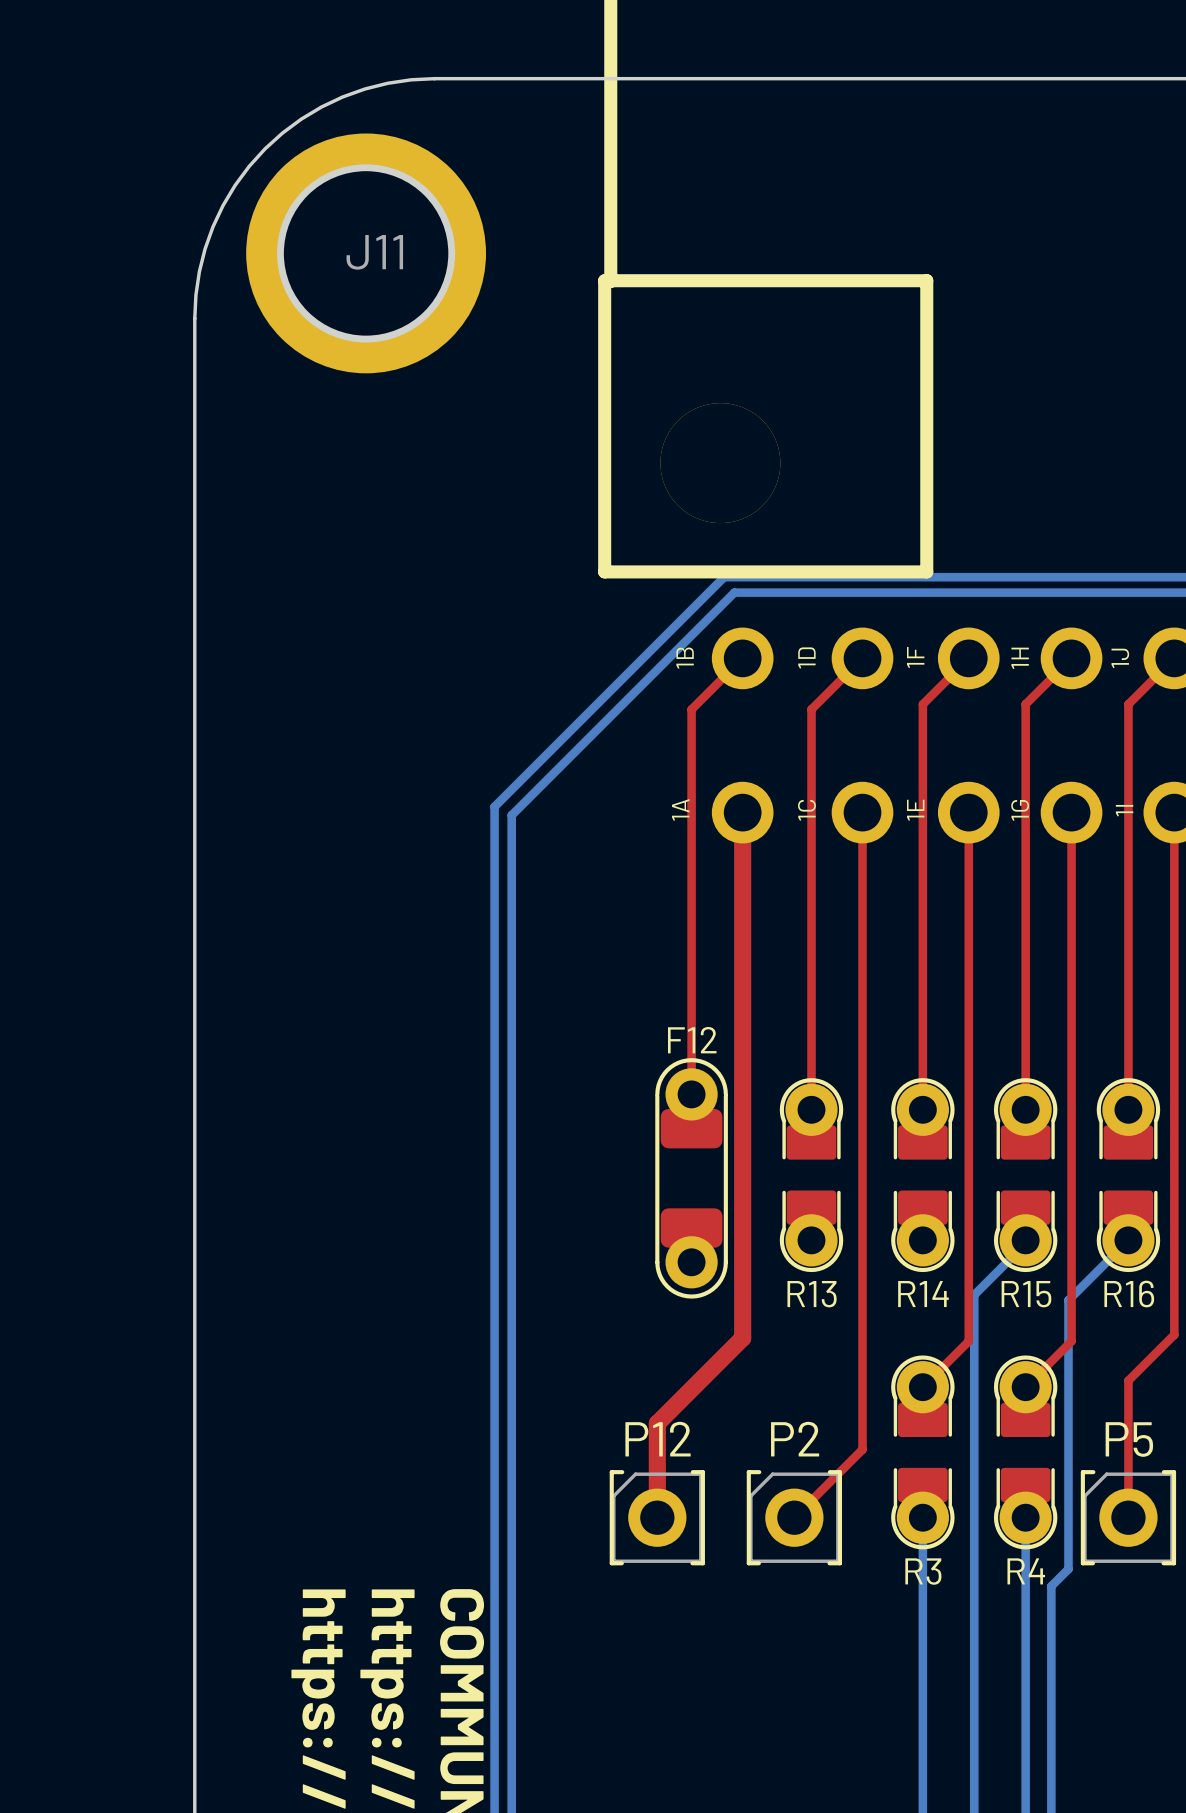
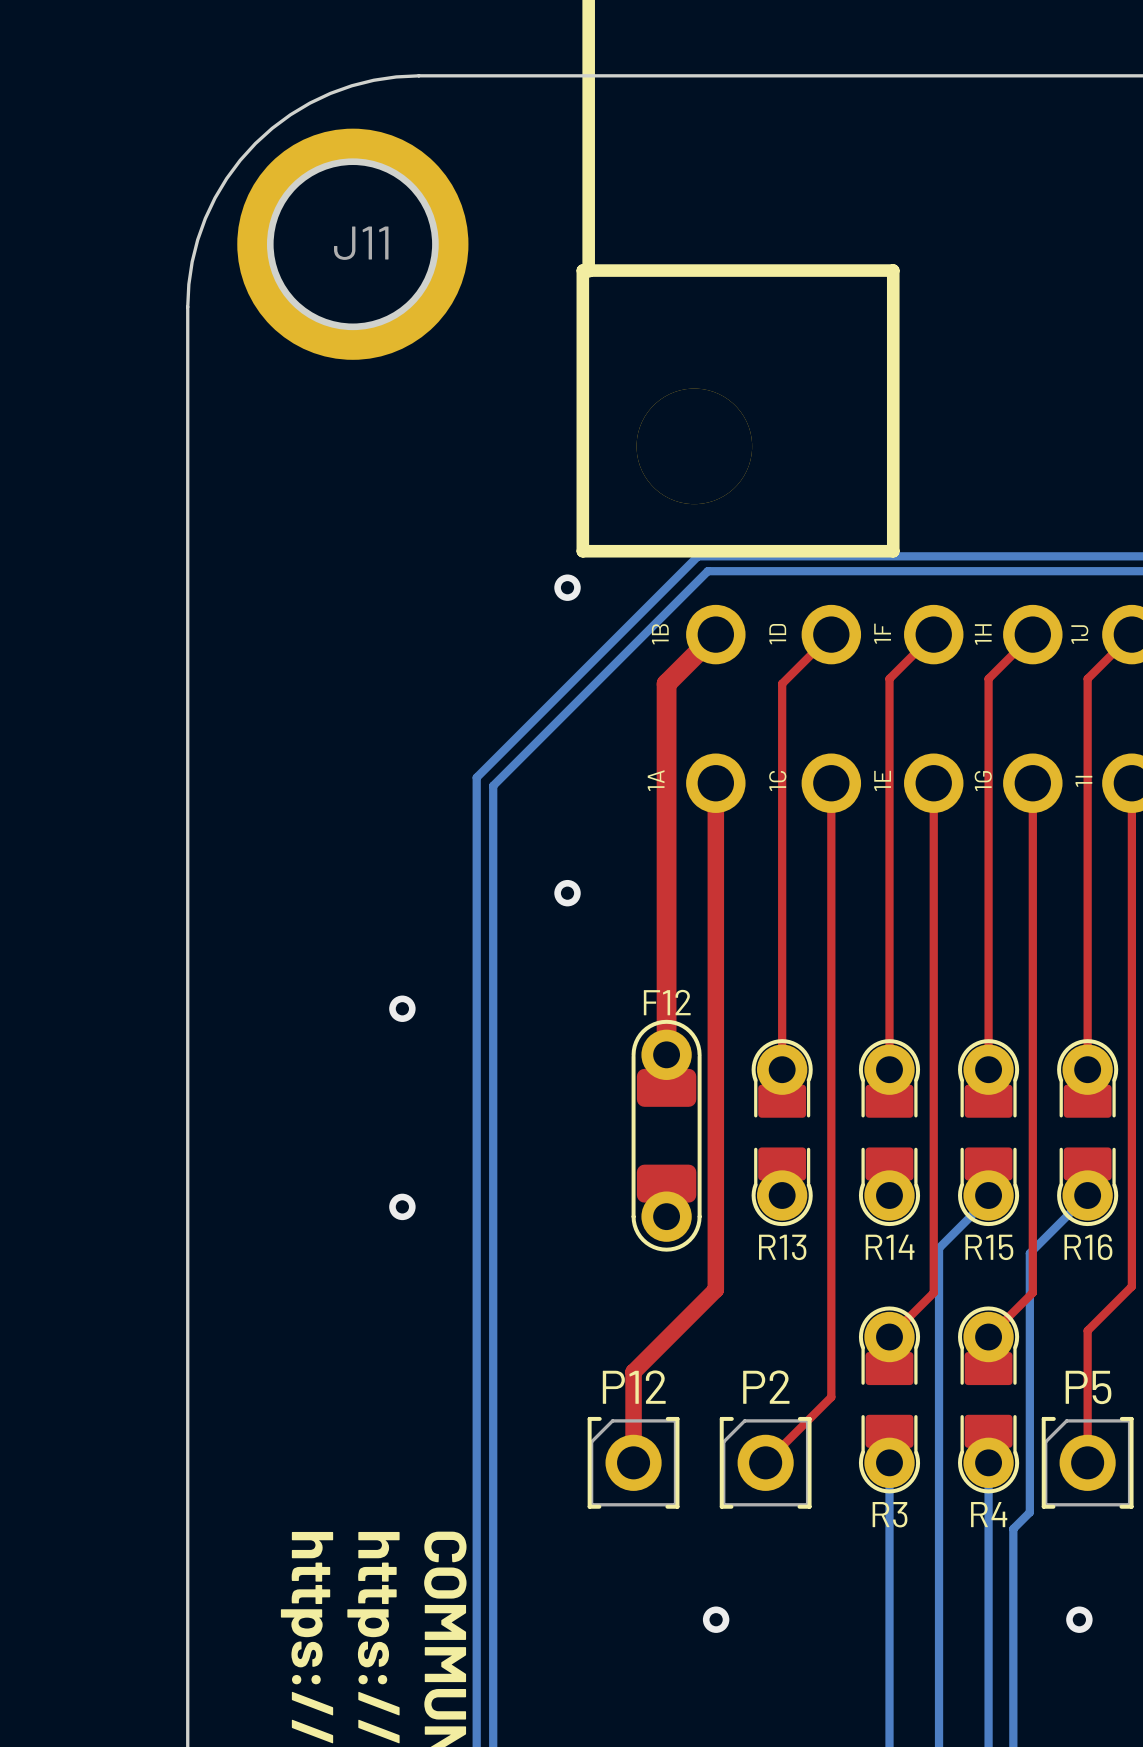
via: none -> (567, 587)
top track width: thin (742, 658) (691, 709) (691, 1094) -> thick (715, 634) (666, 683) (666, 1054)
via: none -> (567, 893)
via: none -> (402, 1008)
via: none -> (402, 1206)
via: none -> (716, 1619)
via: none -> (1079, 1619)

